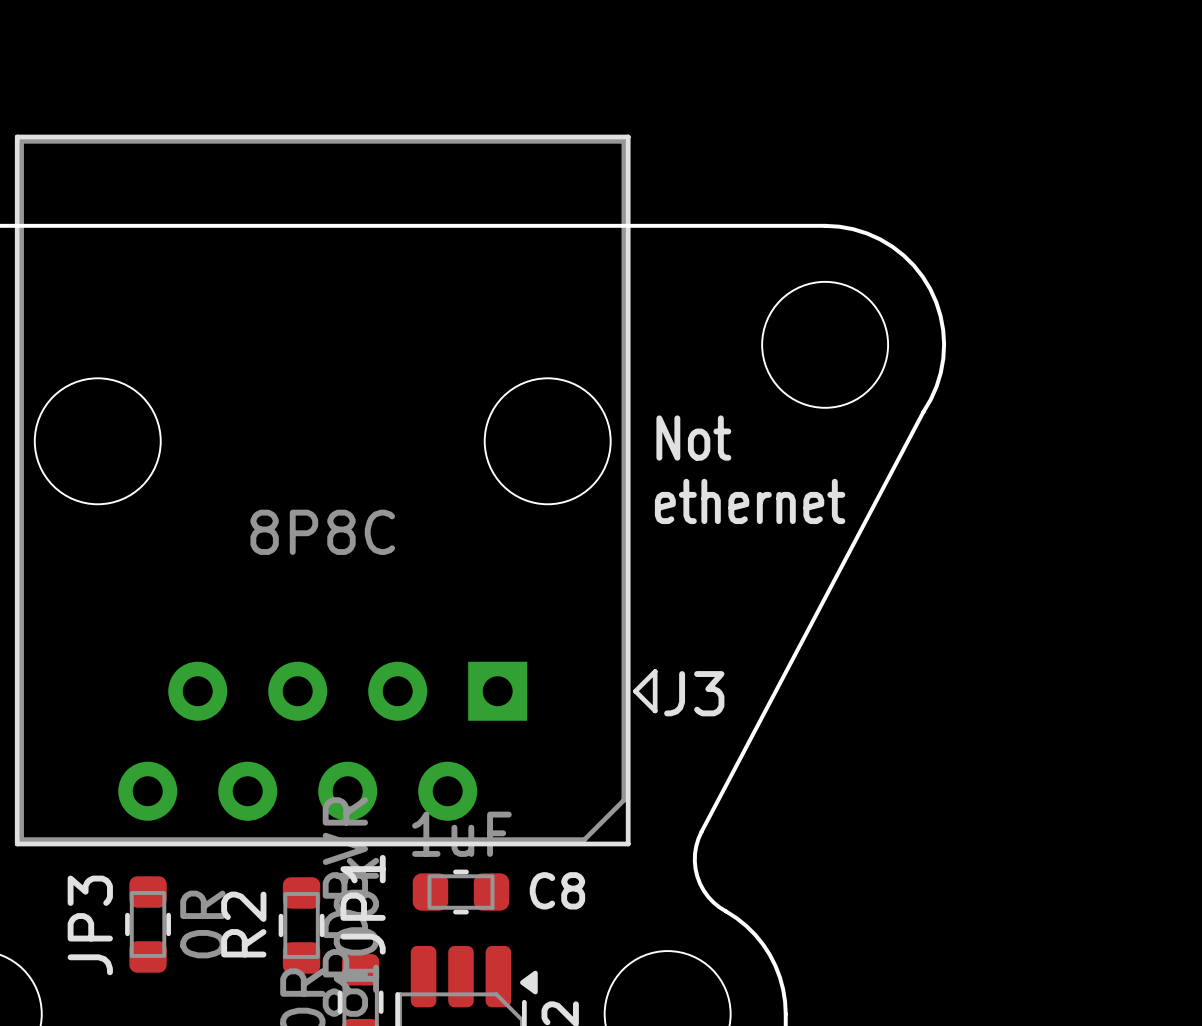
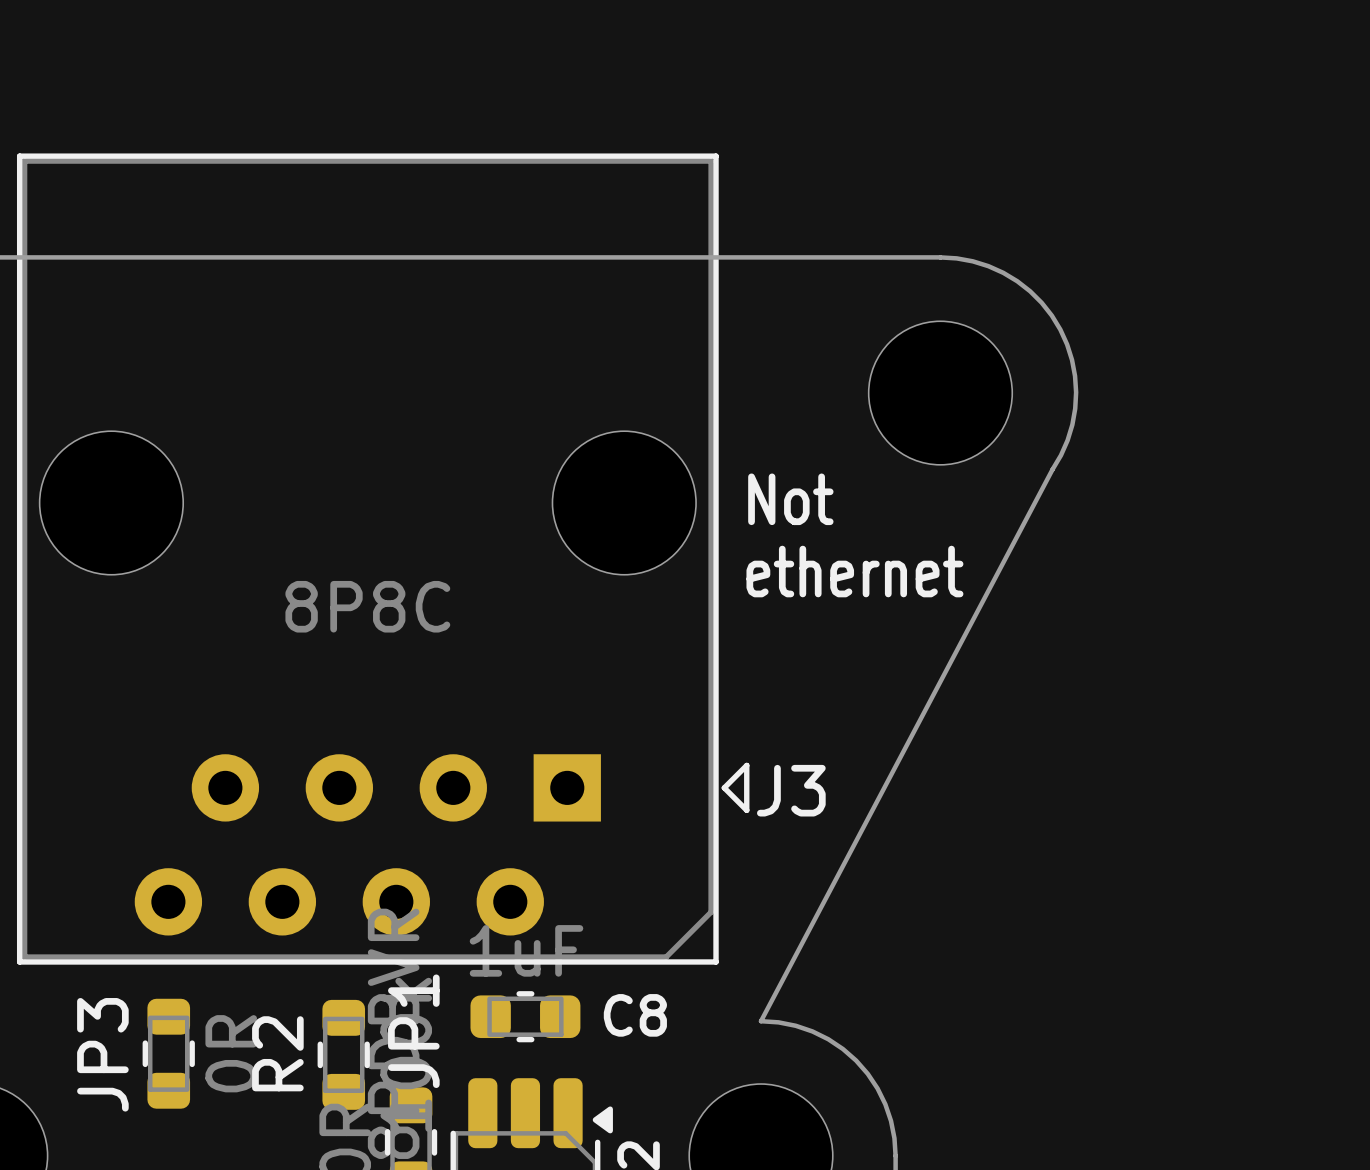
board edge: (701, 831) (695, 853) (697, 876) (708, 896) (726, 911) -> none
board edge: (726, 911) (755, 934) (769, 954) (783, 989) (785, 1014) -> (799, 947) (761, 1021) (795, 1025) (812, 1031) (828, 1039) (856, 1060) (867, 1073) (885, 1104) (891, 1120) (895, 1155)

